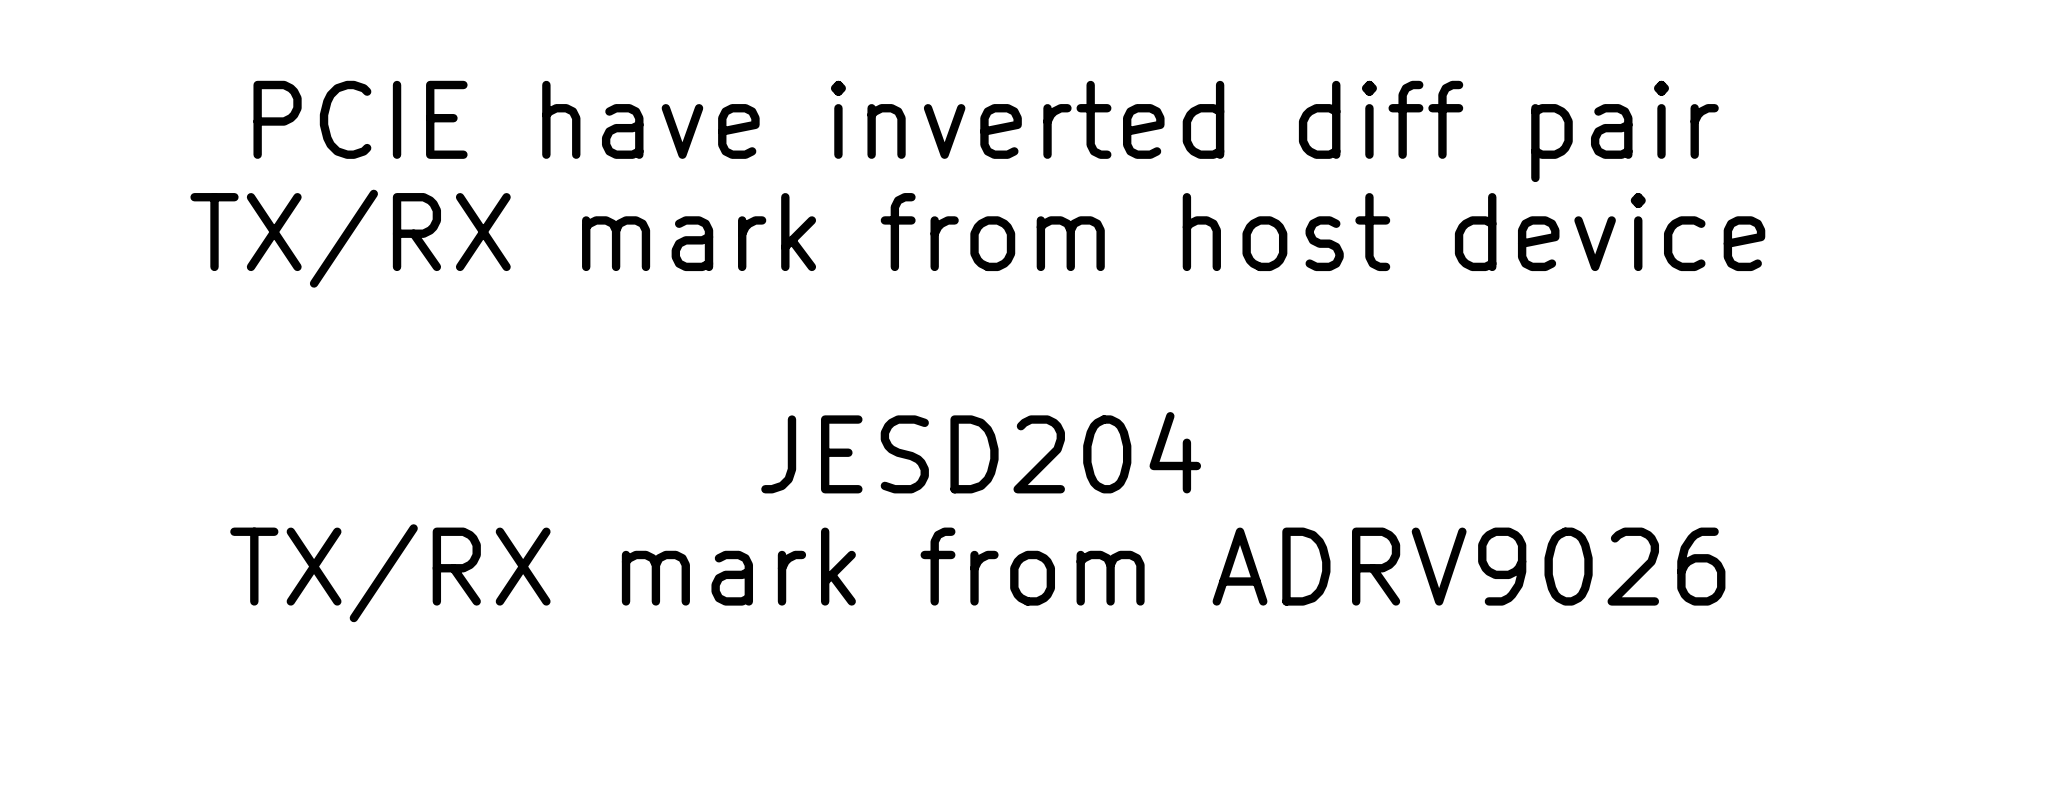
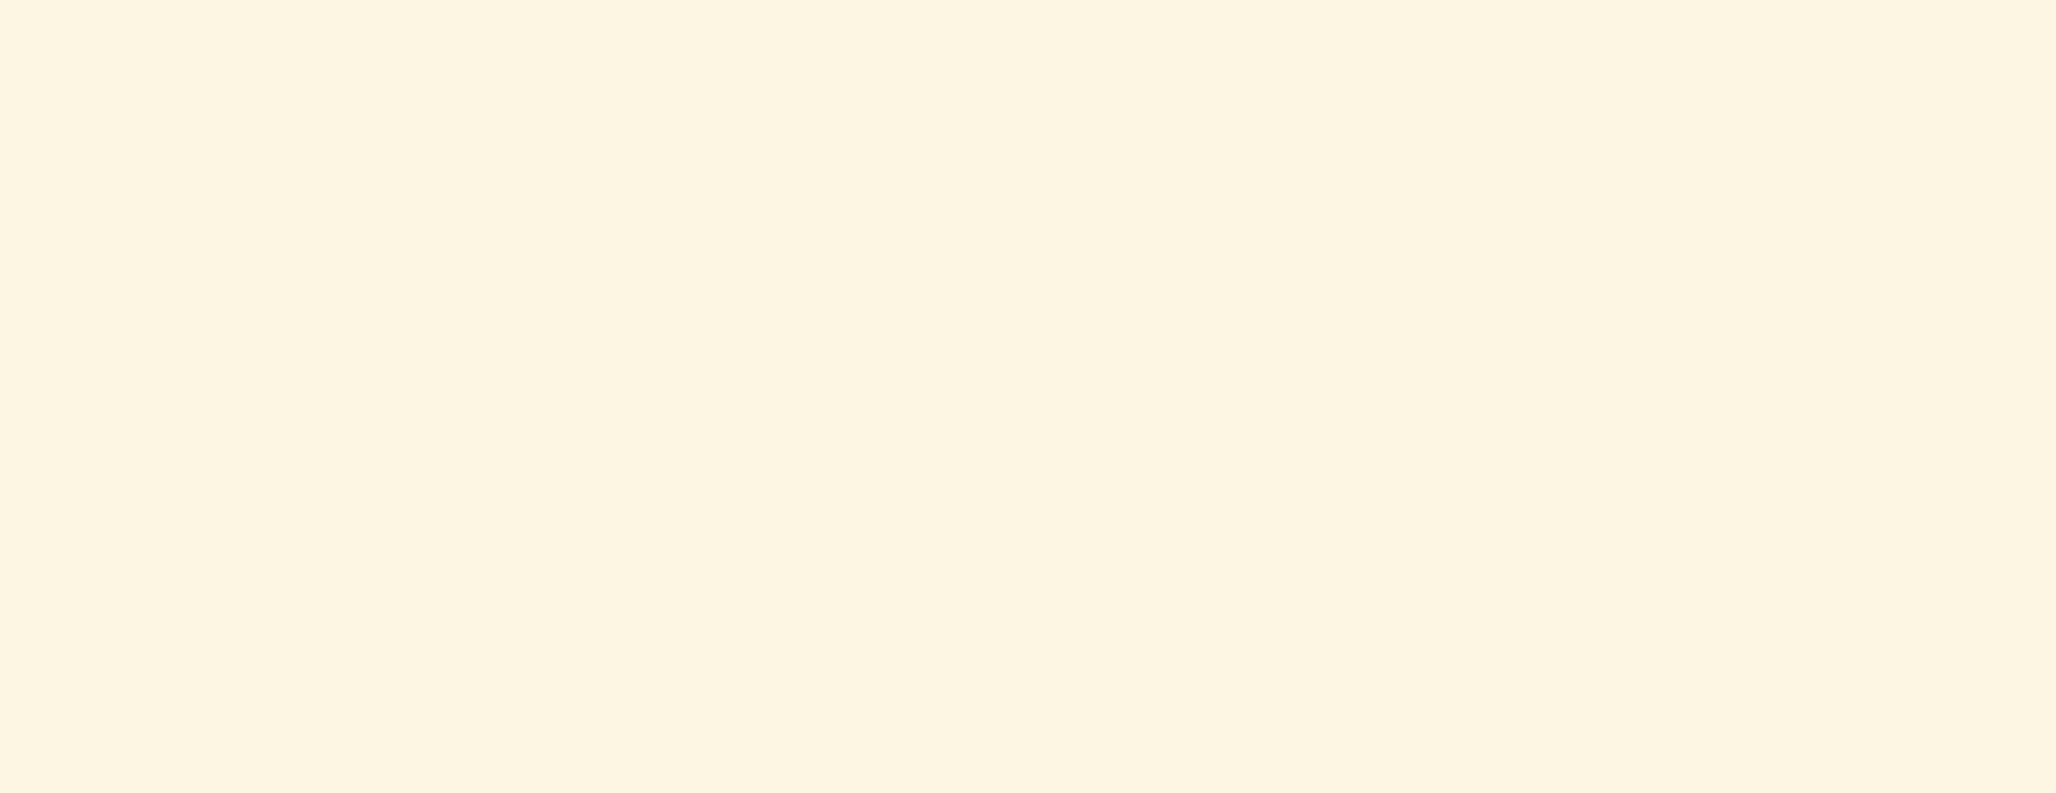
text: PCIE have inverted diff pair (986, 131) -> none
text: TX/RX mark from host device (977, 238) -> none
text: JESD204 (981, 452) -> none
text: TX/RX mark from ADRV9026 (977, 573) -> none

